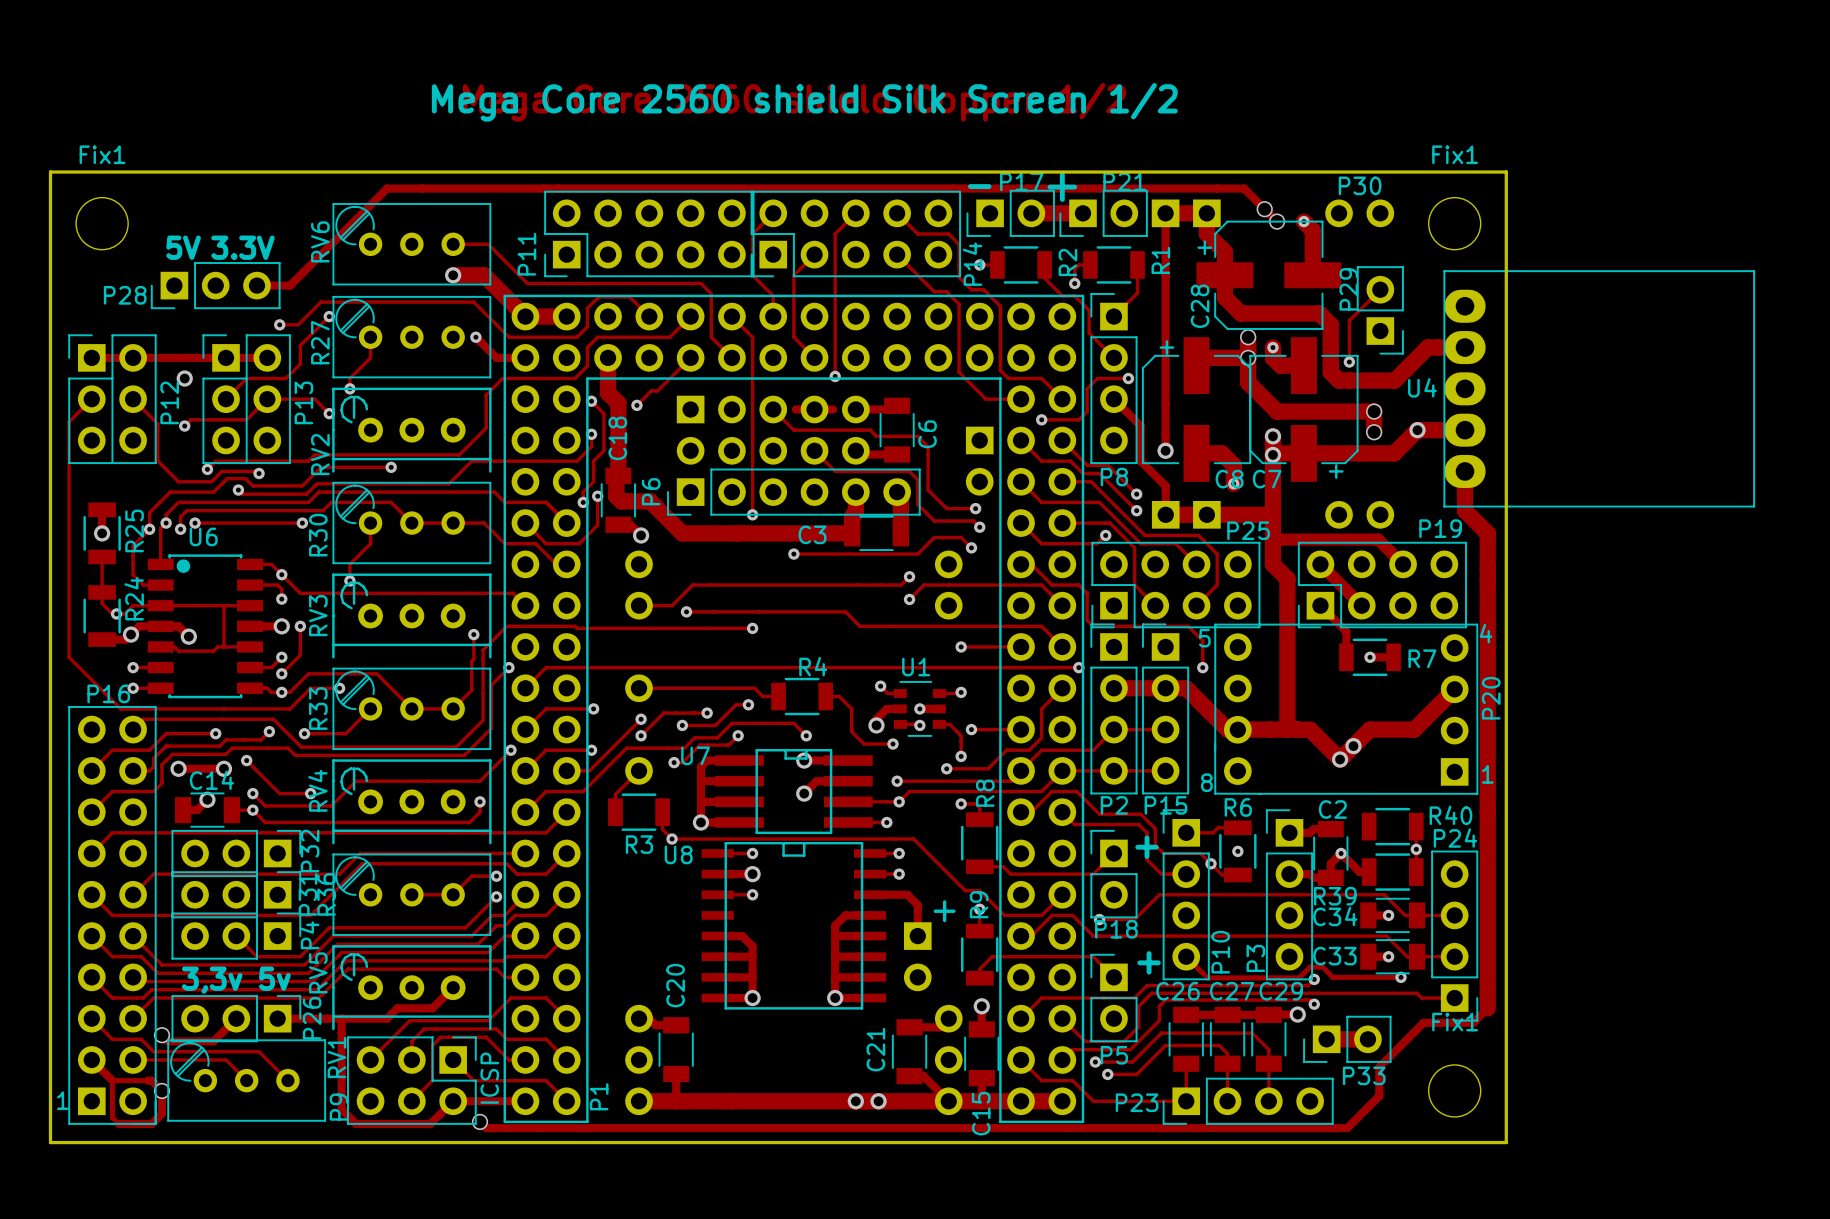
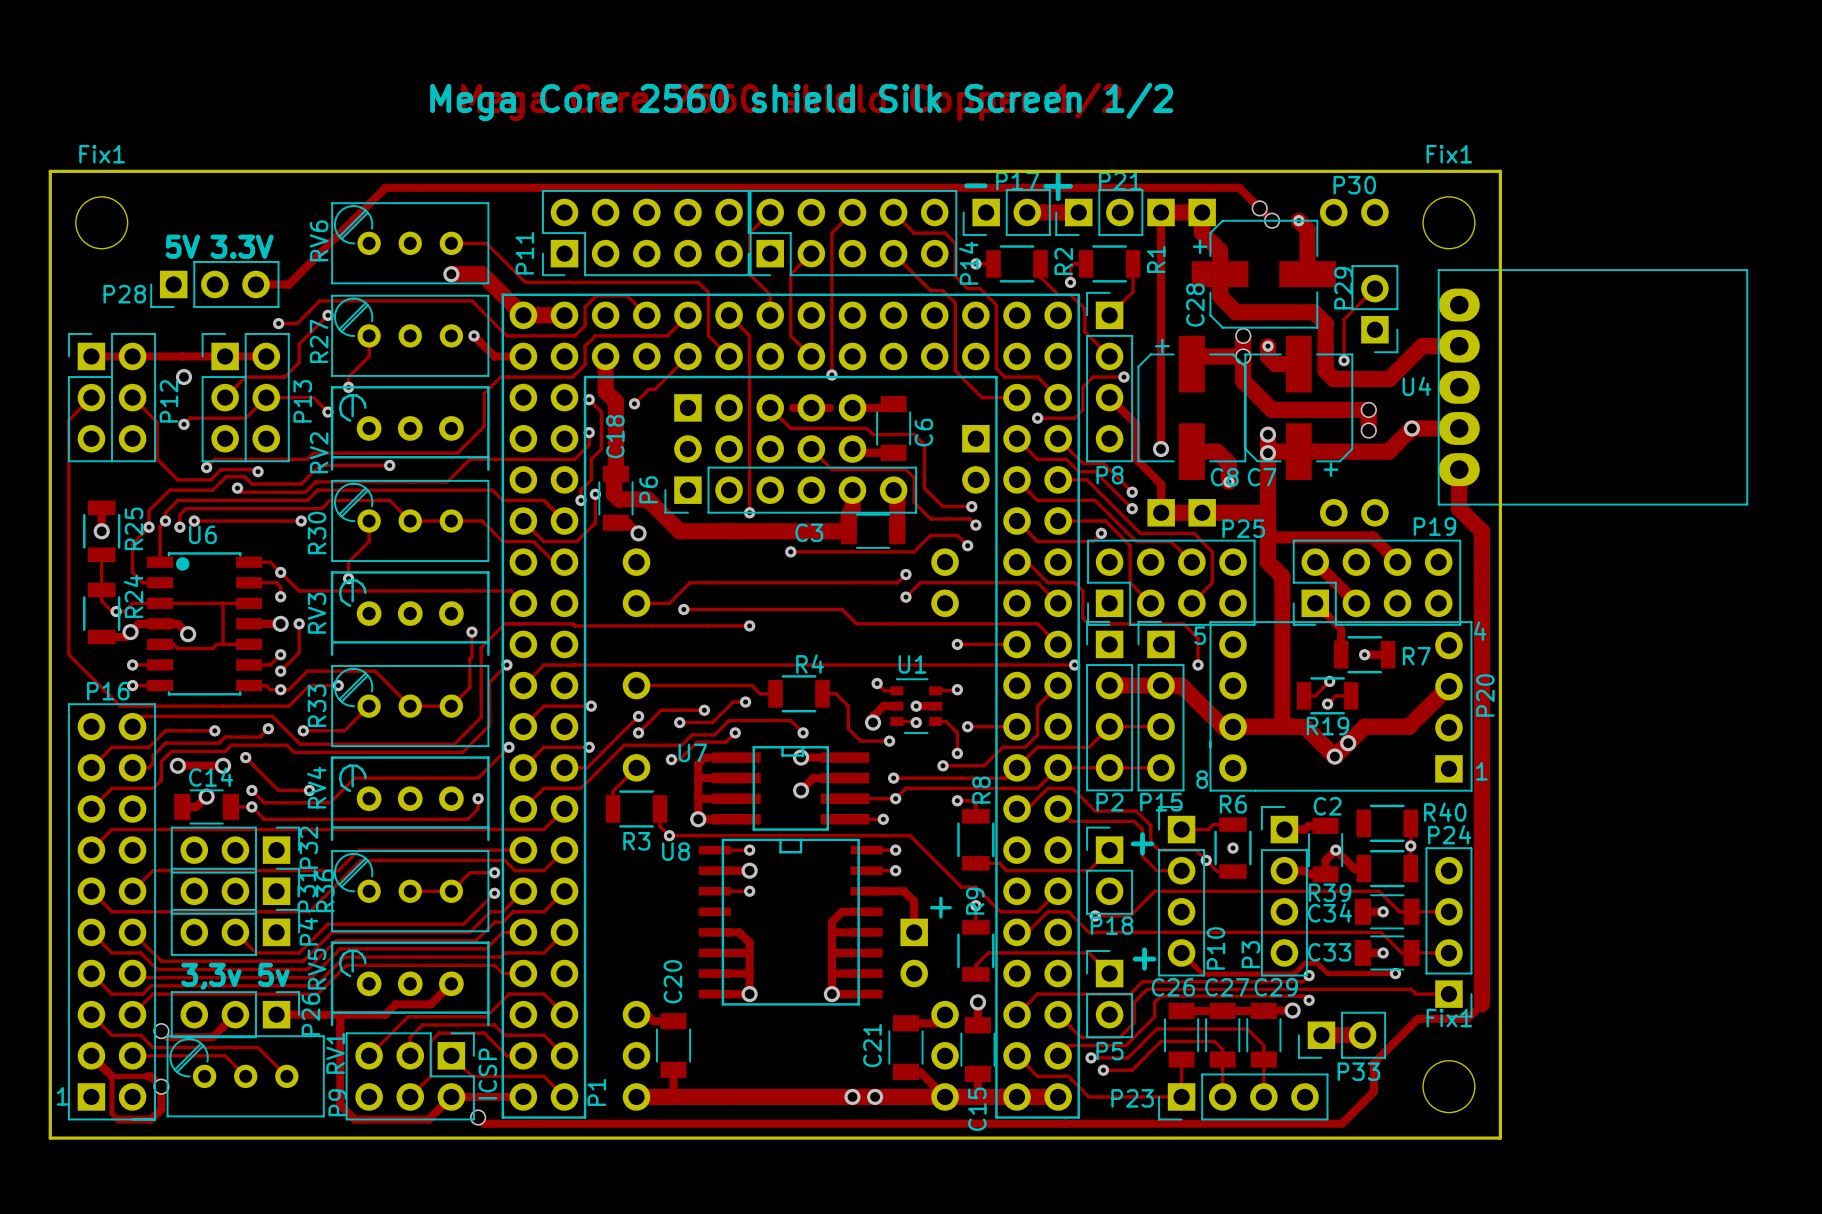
track: none -> (1329, 681) (1315, 695) (1304, 695)
via: none -> (1329, 681)
R19: none -> (1327, 695)
track: none -> (1351, 695) (1335, 695) (1327, 704)
via: none -> (1327, 704)

